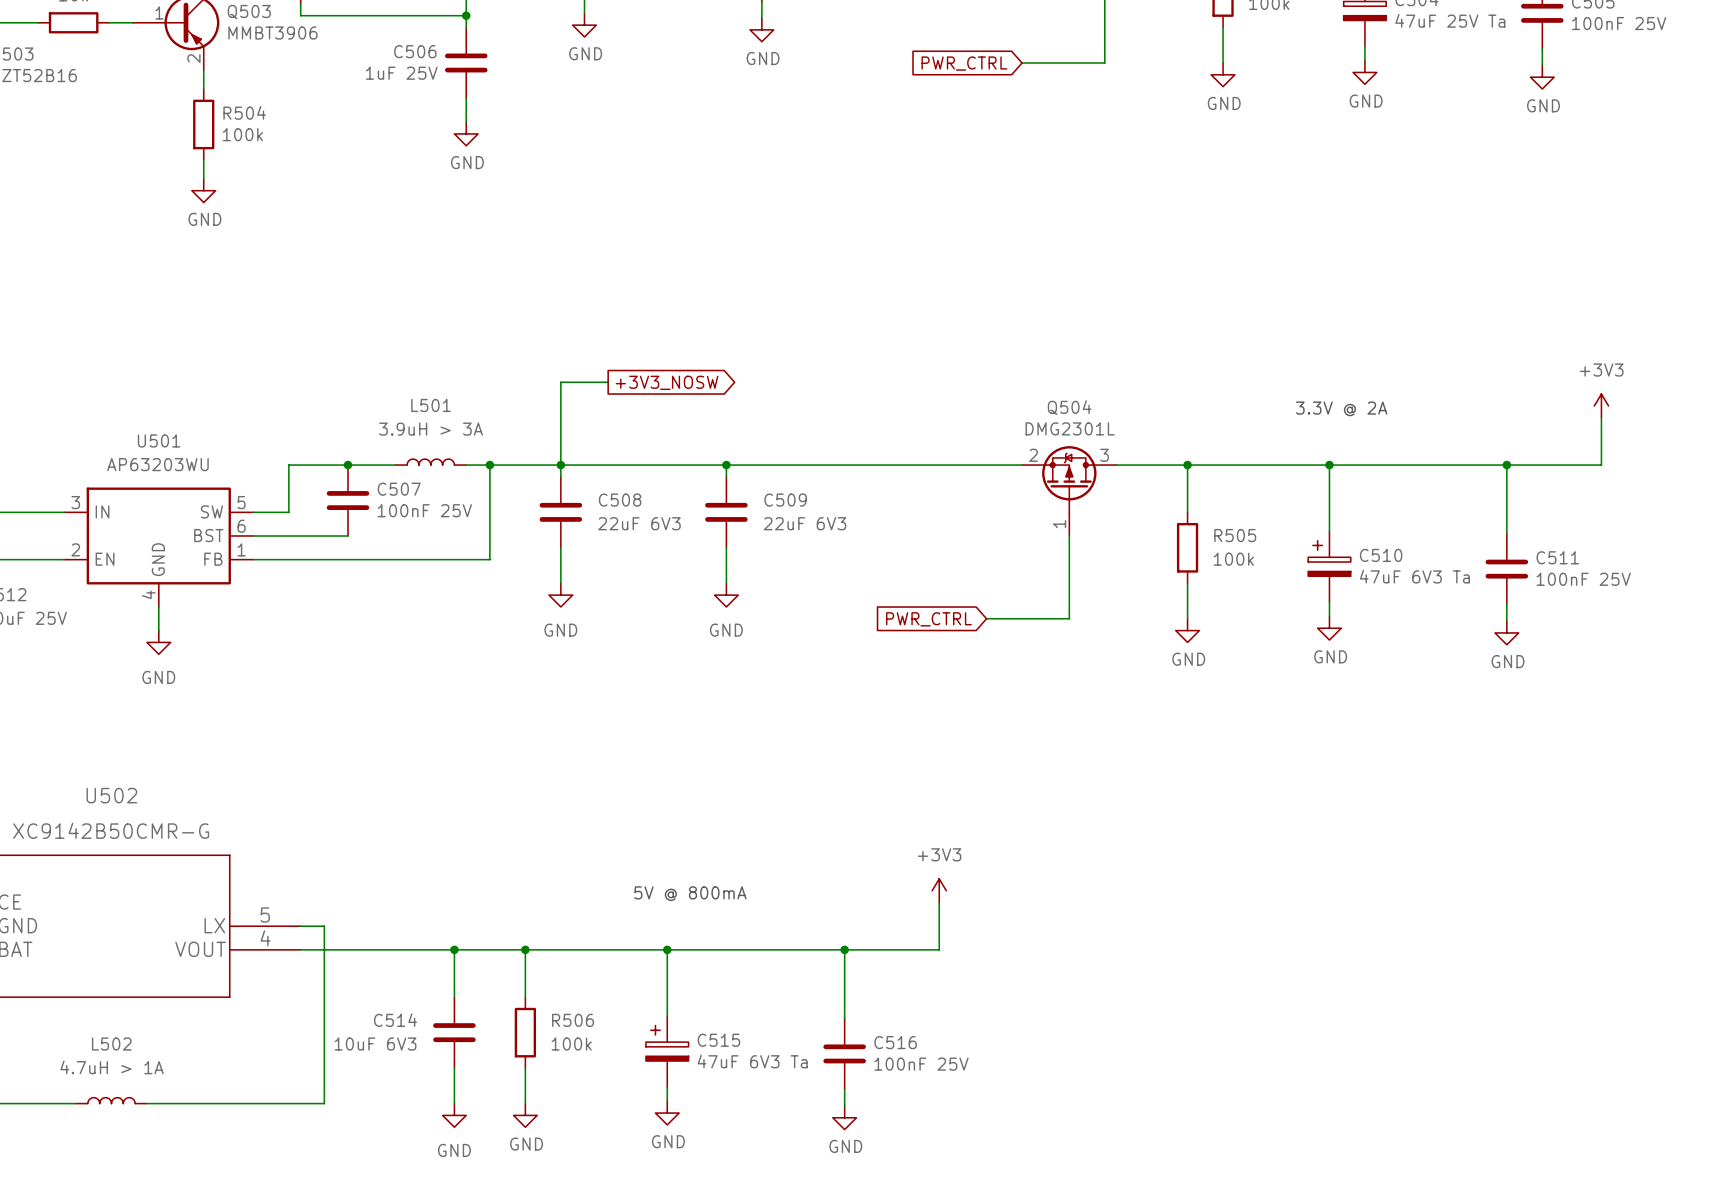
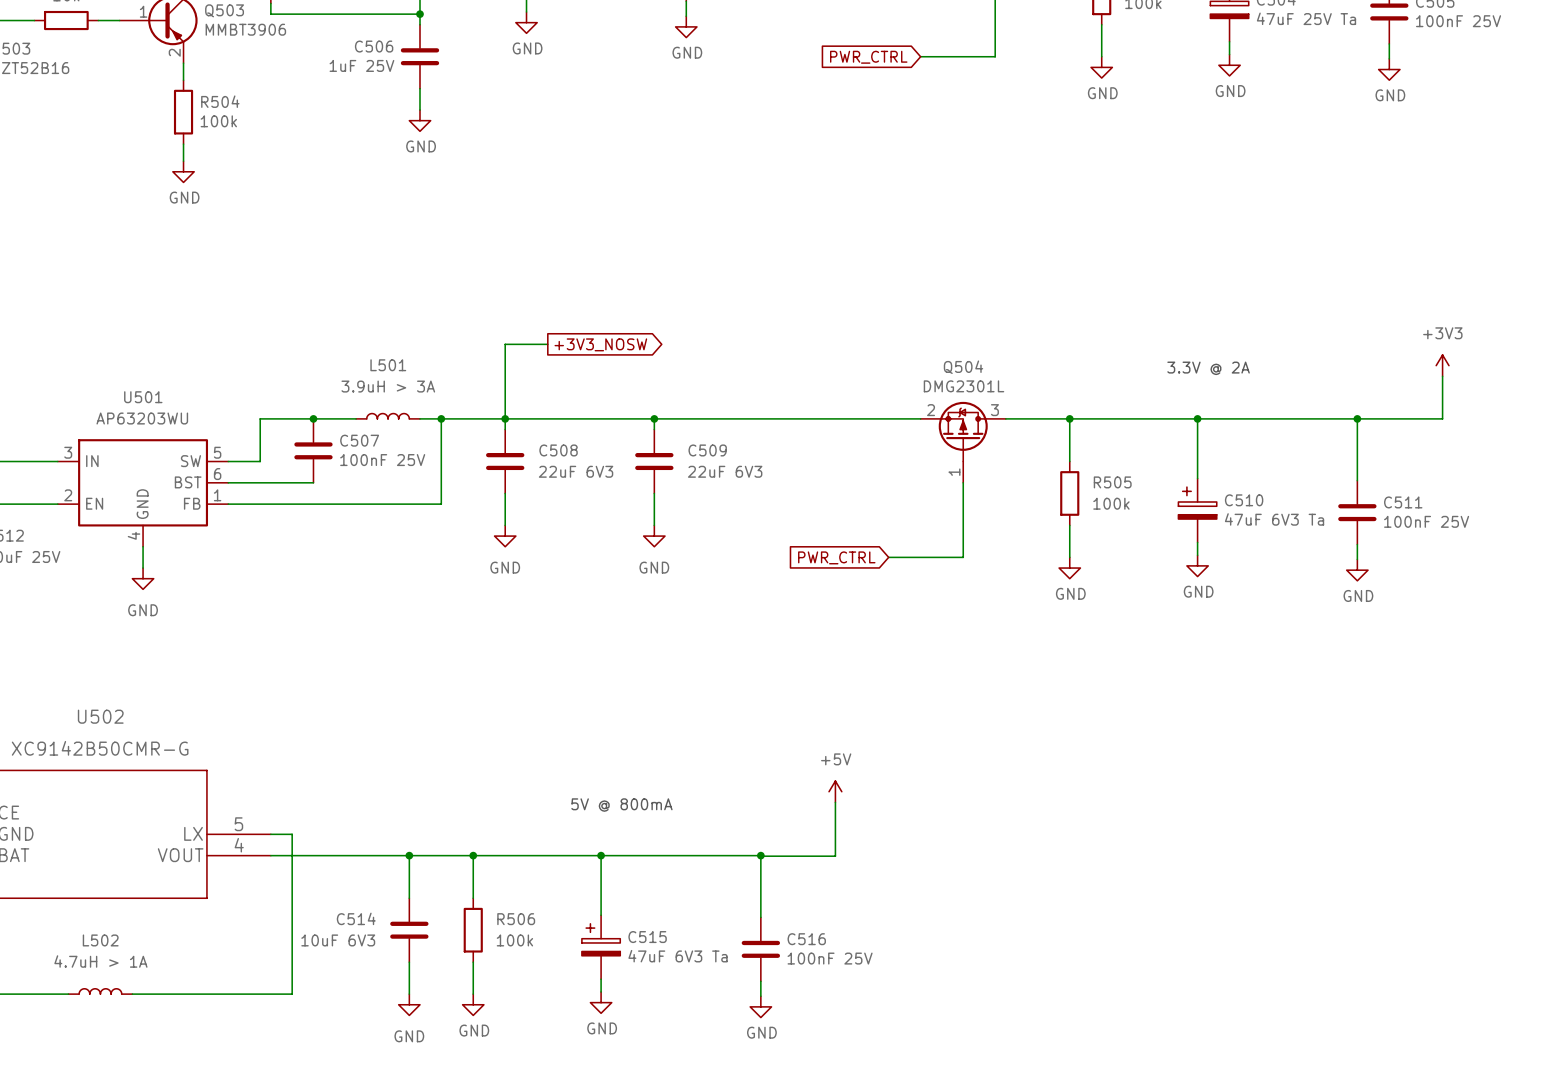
power symbol: none -> +5V (835, 791)
wire: none -> (835, 802) (835, 856) (760, 856)
power symbol: +3V3 (939, 890) -> none
wire: (939, 902) (939, 949) (844, 949) -> none

